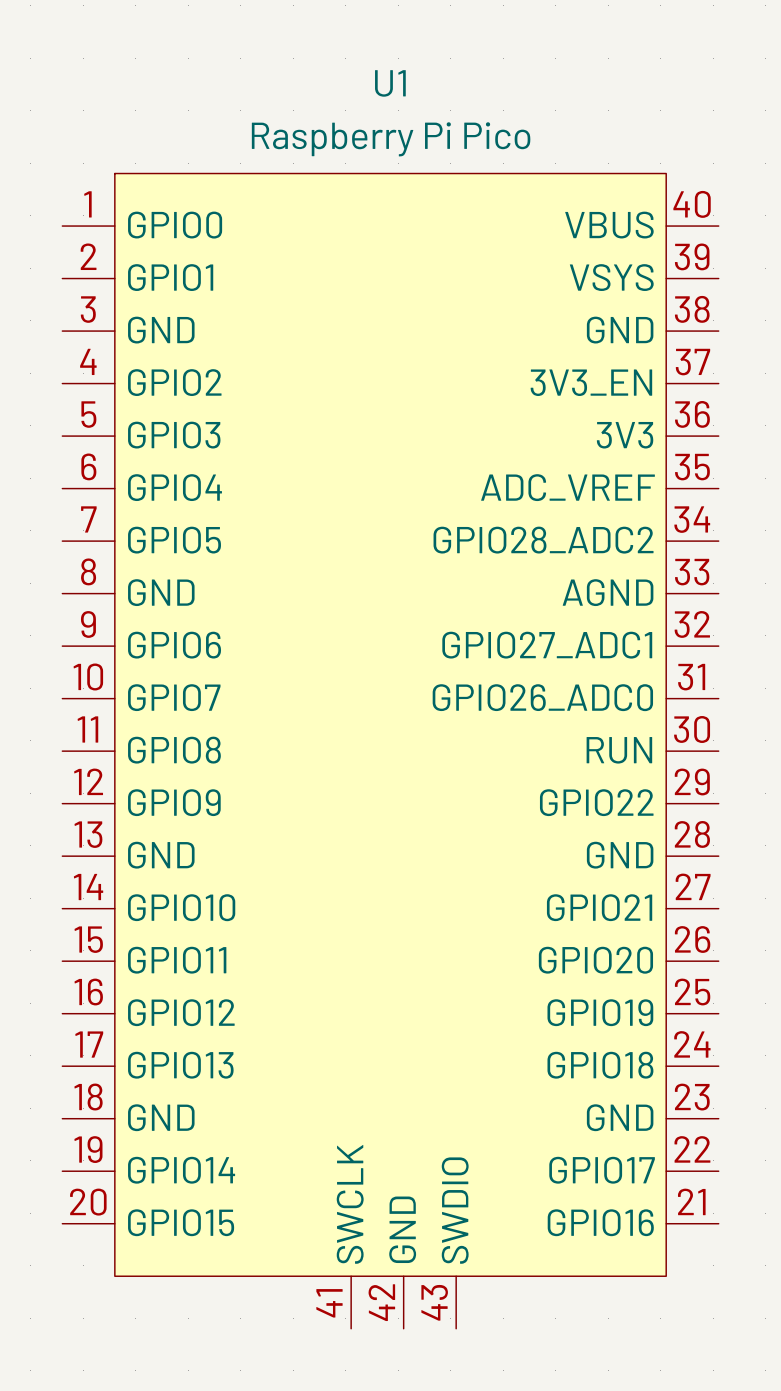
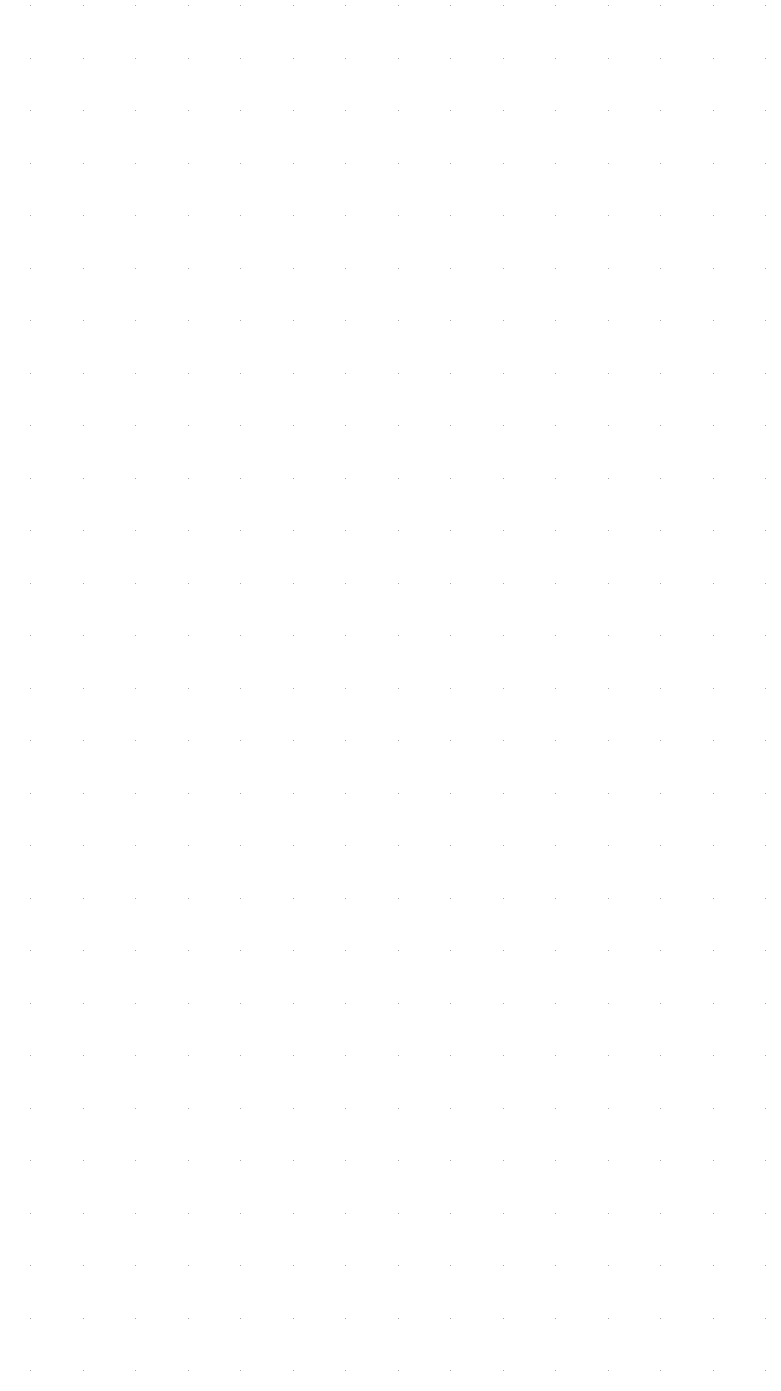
U1: Raspberry Pi Pico (390, 751) -> none

